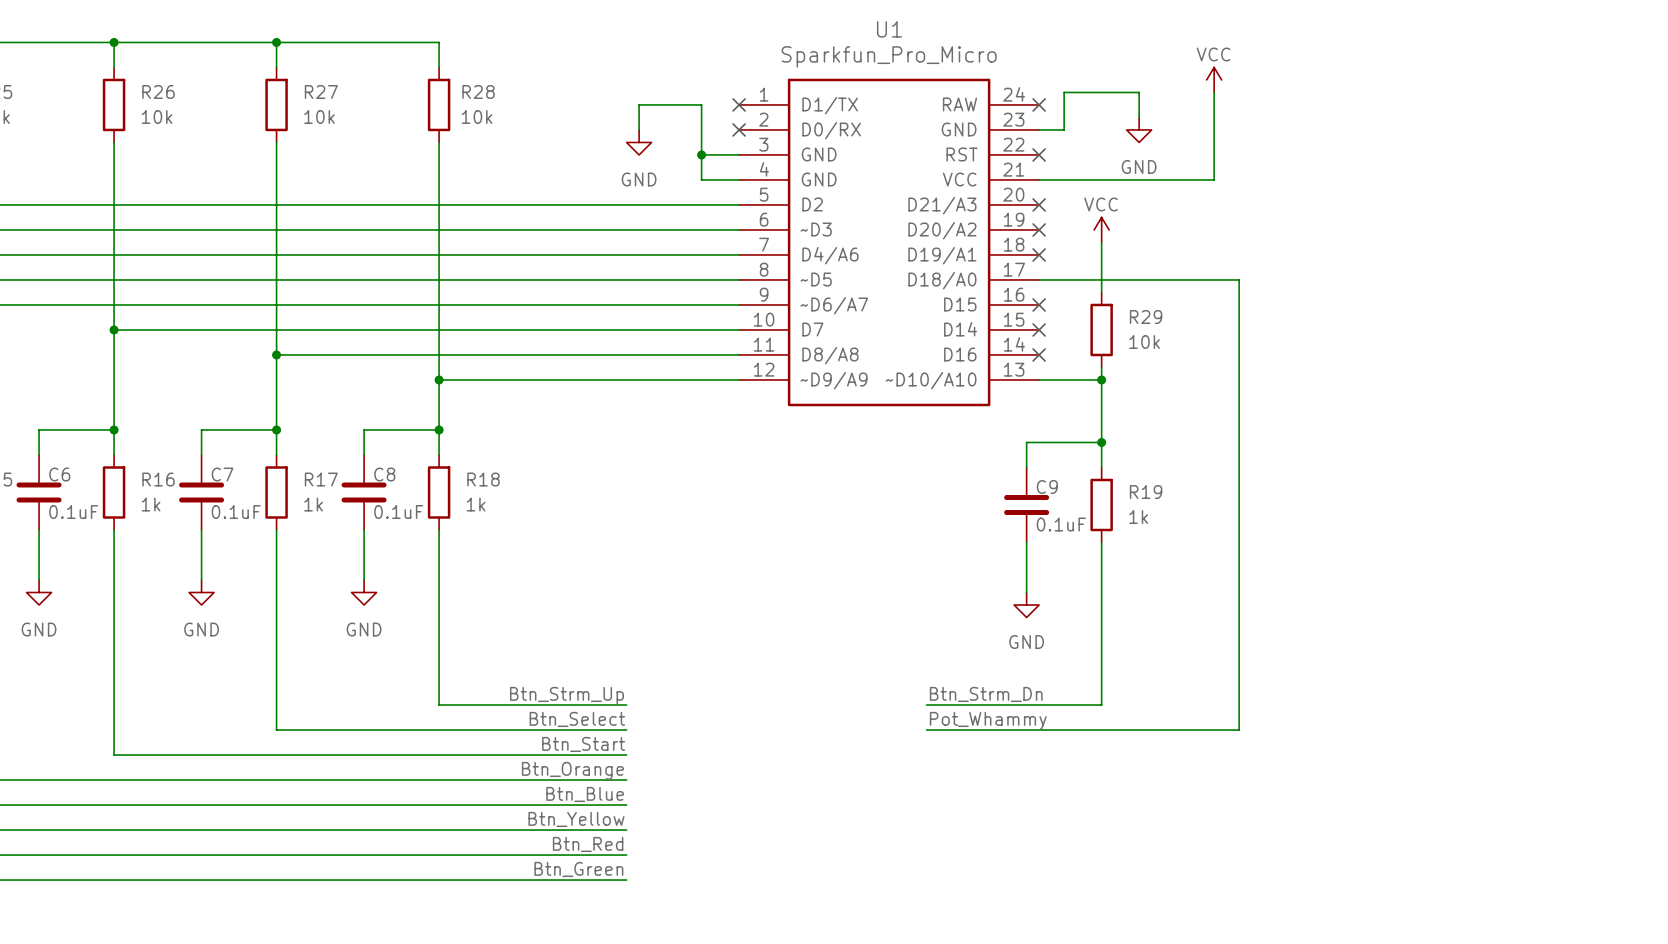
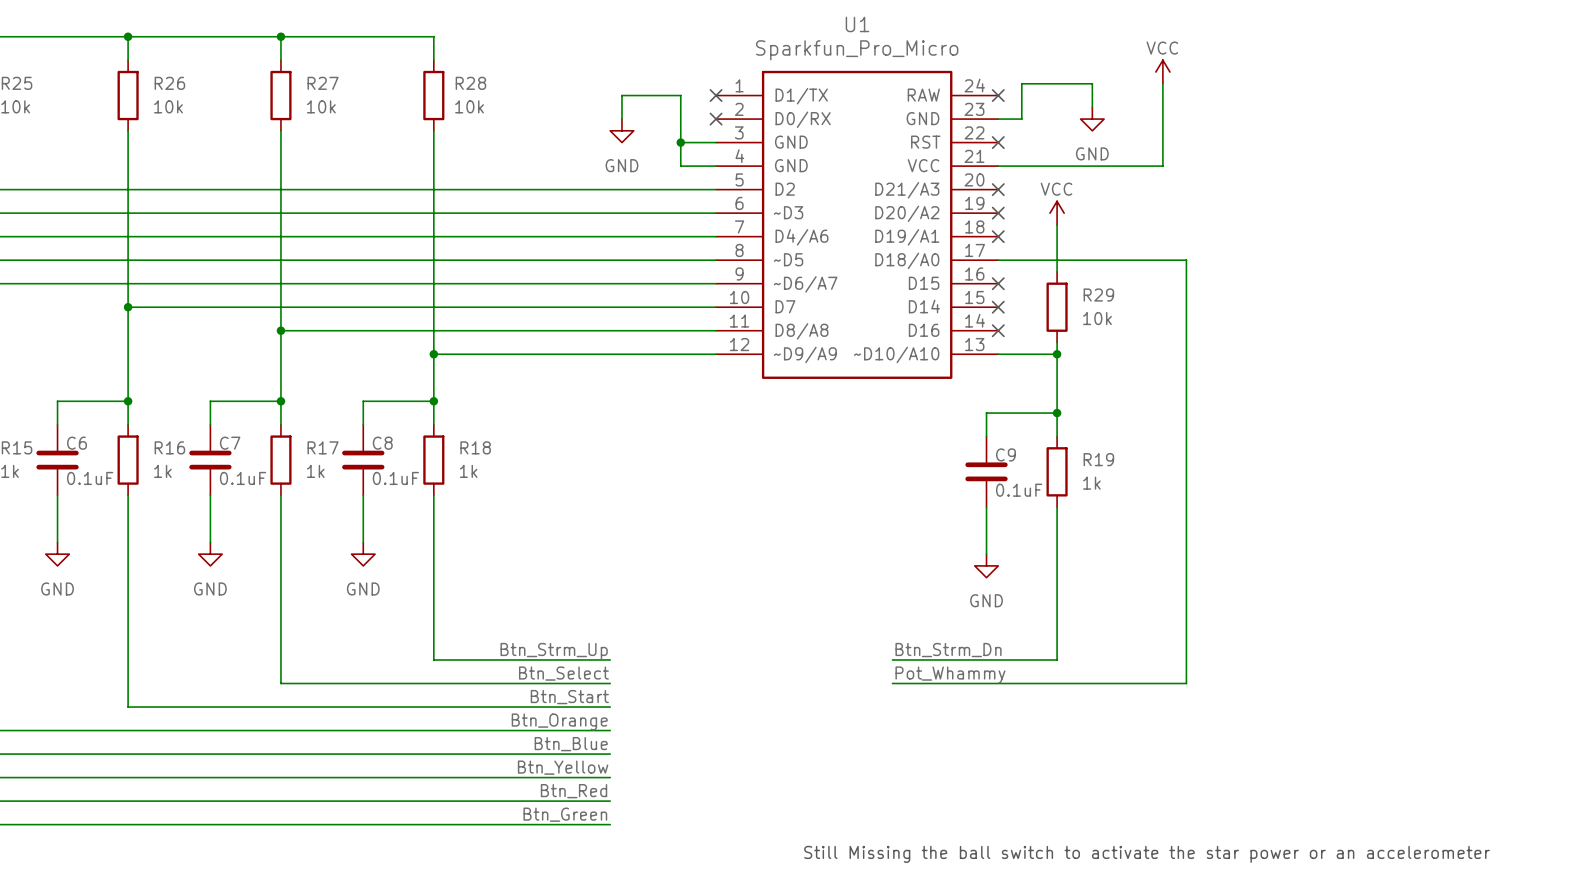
text: none -> Still Missing the ball switch to activate the star power or an accelerometer (1147, 854)

